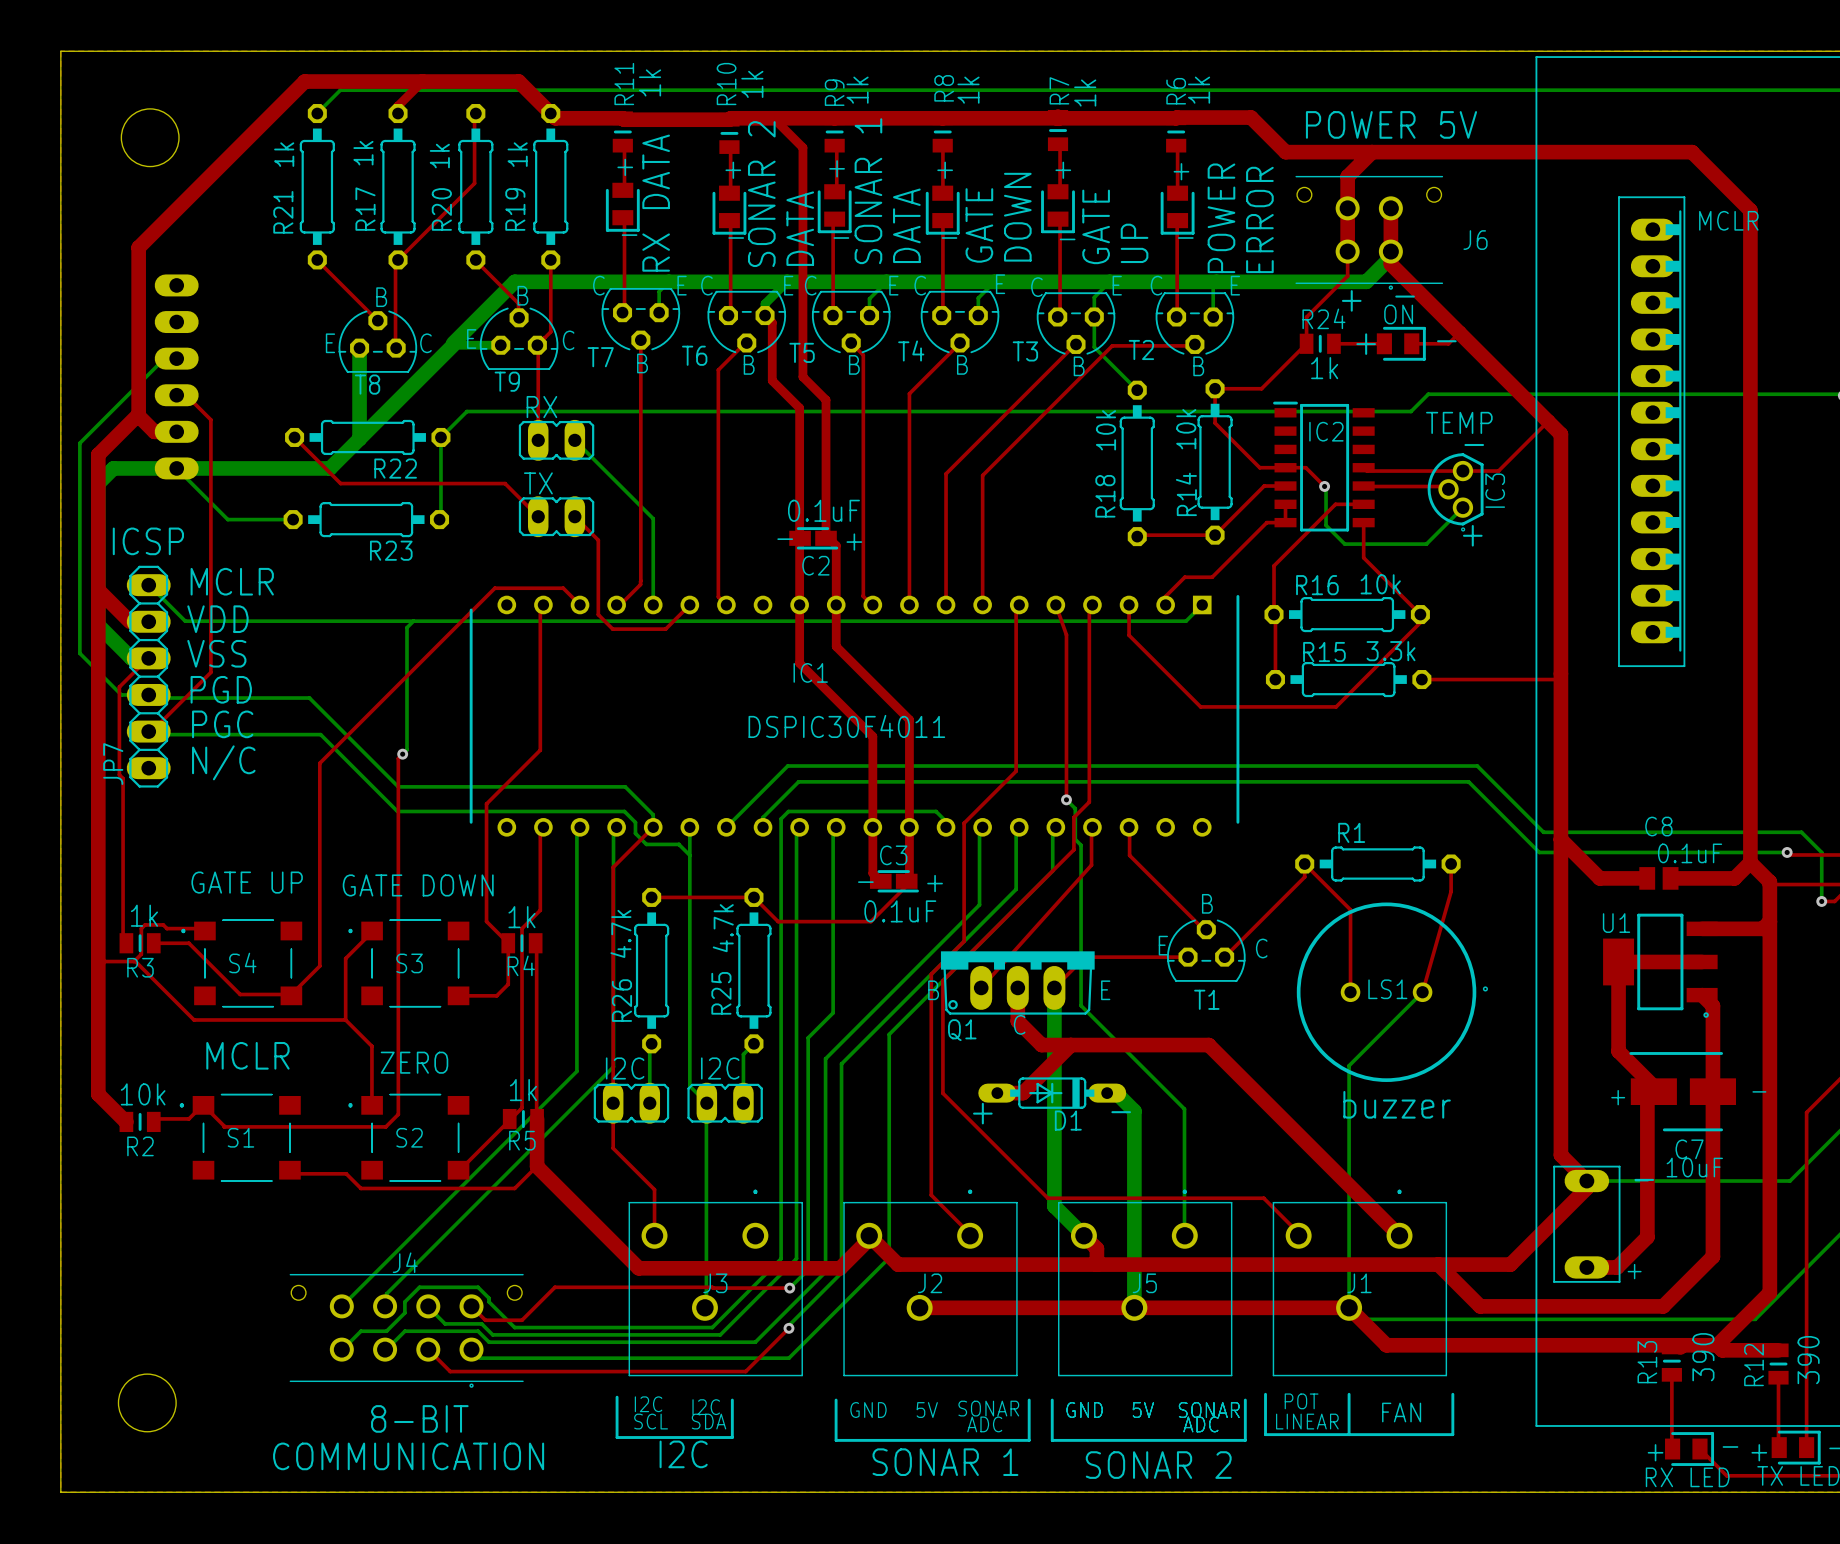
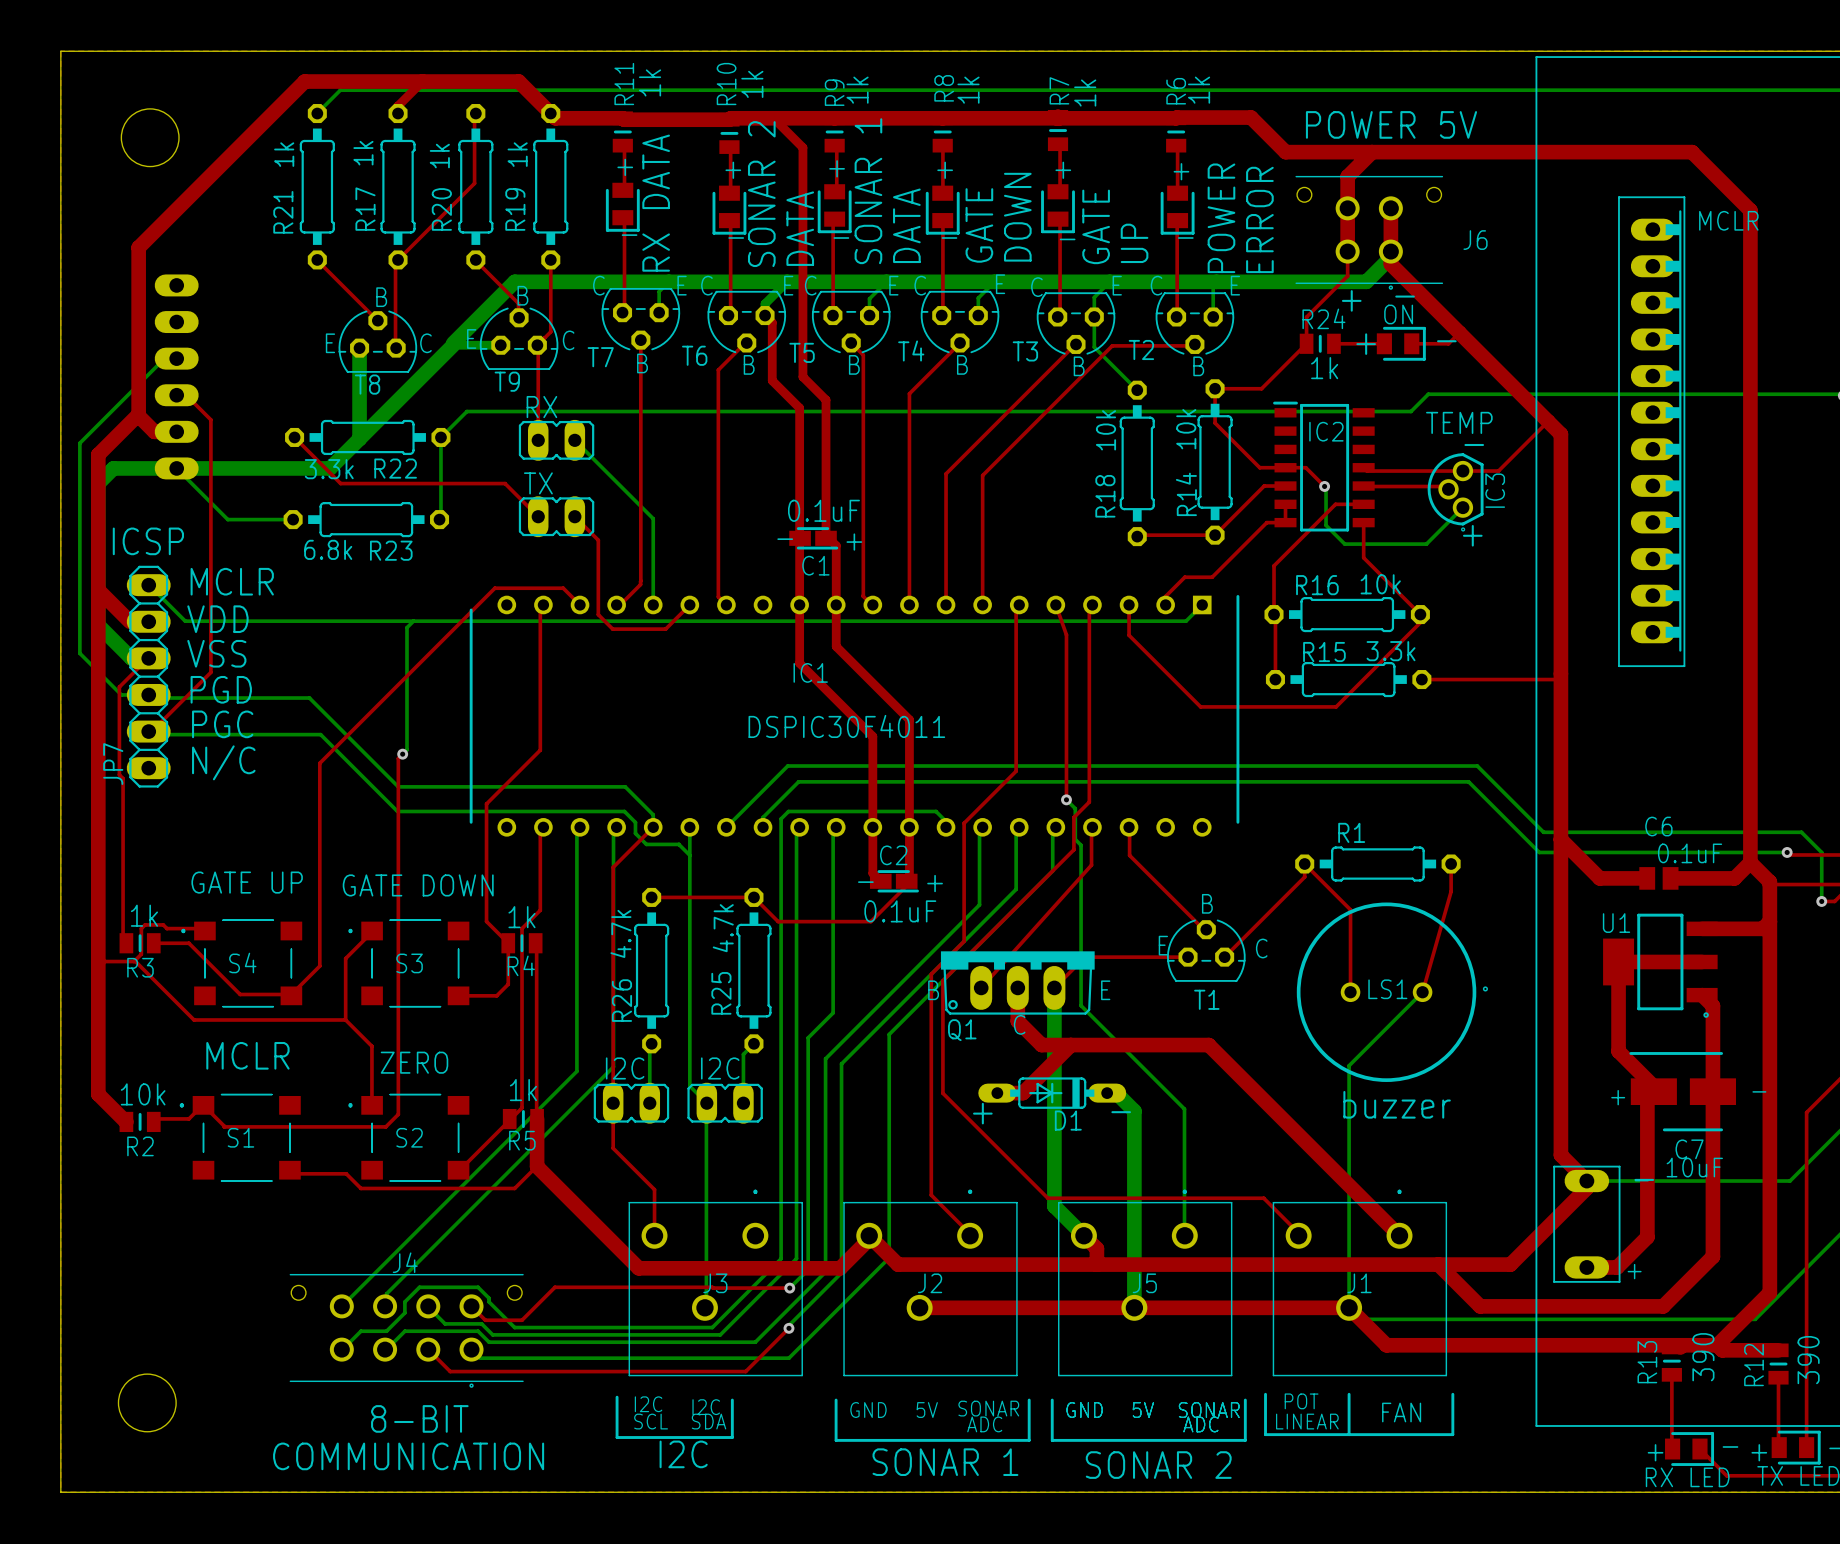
R22 value: none -> 3.3k (329, 469)
R23 value: none -> 6.8k (328, 549)
C2 name: C2 (815, 565) -> C1 (815, 565)
C8 name: C8 (1658, 826) -> C6 (1658, 826)
C3 name: C3 (893, 855) -> C2 (893, 855)

